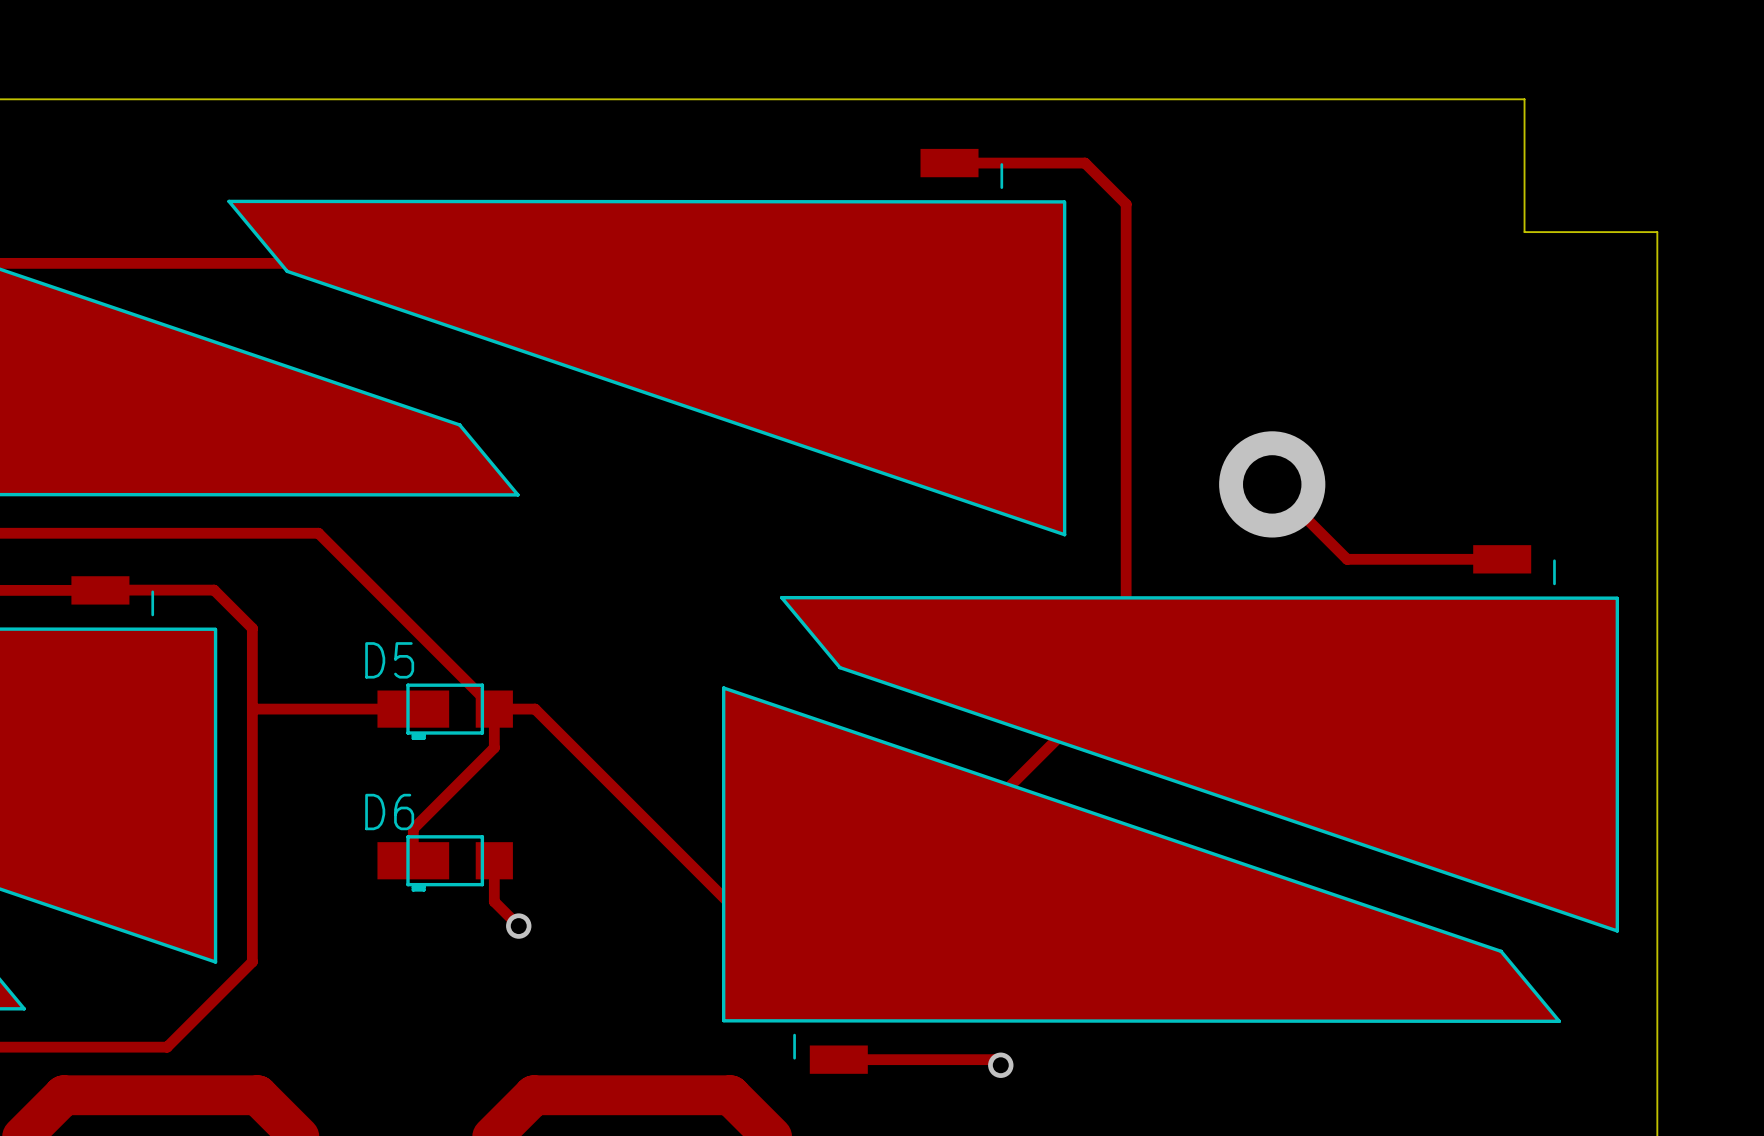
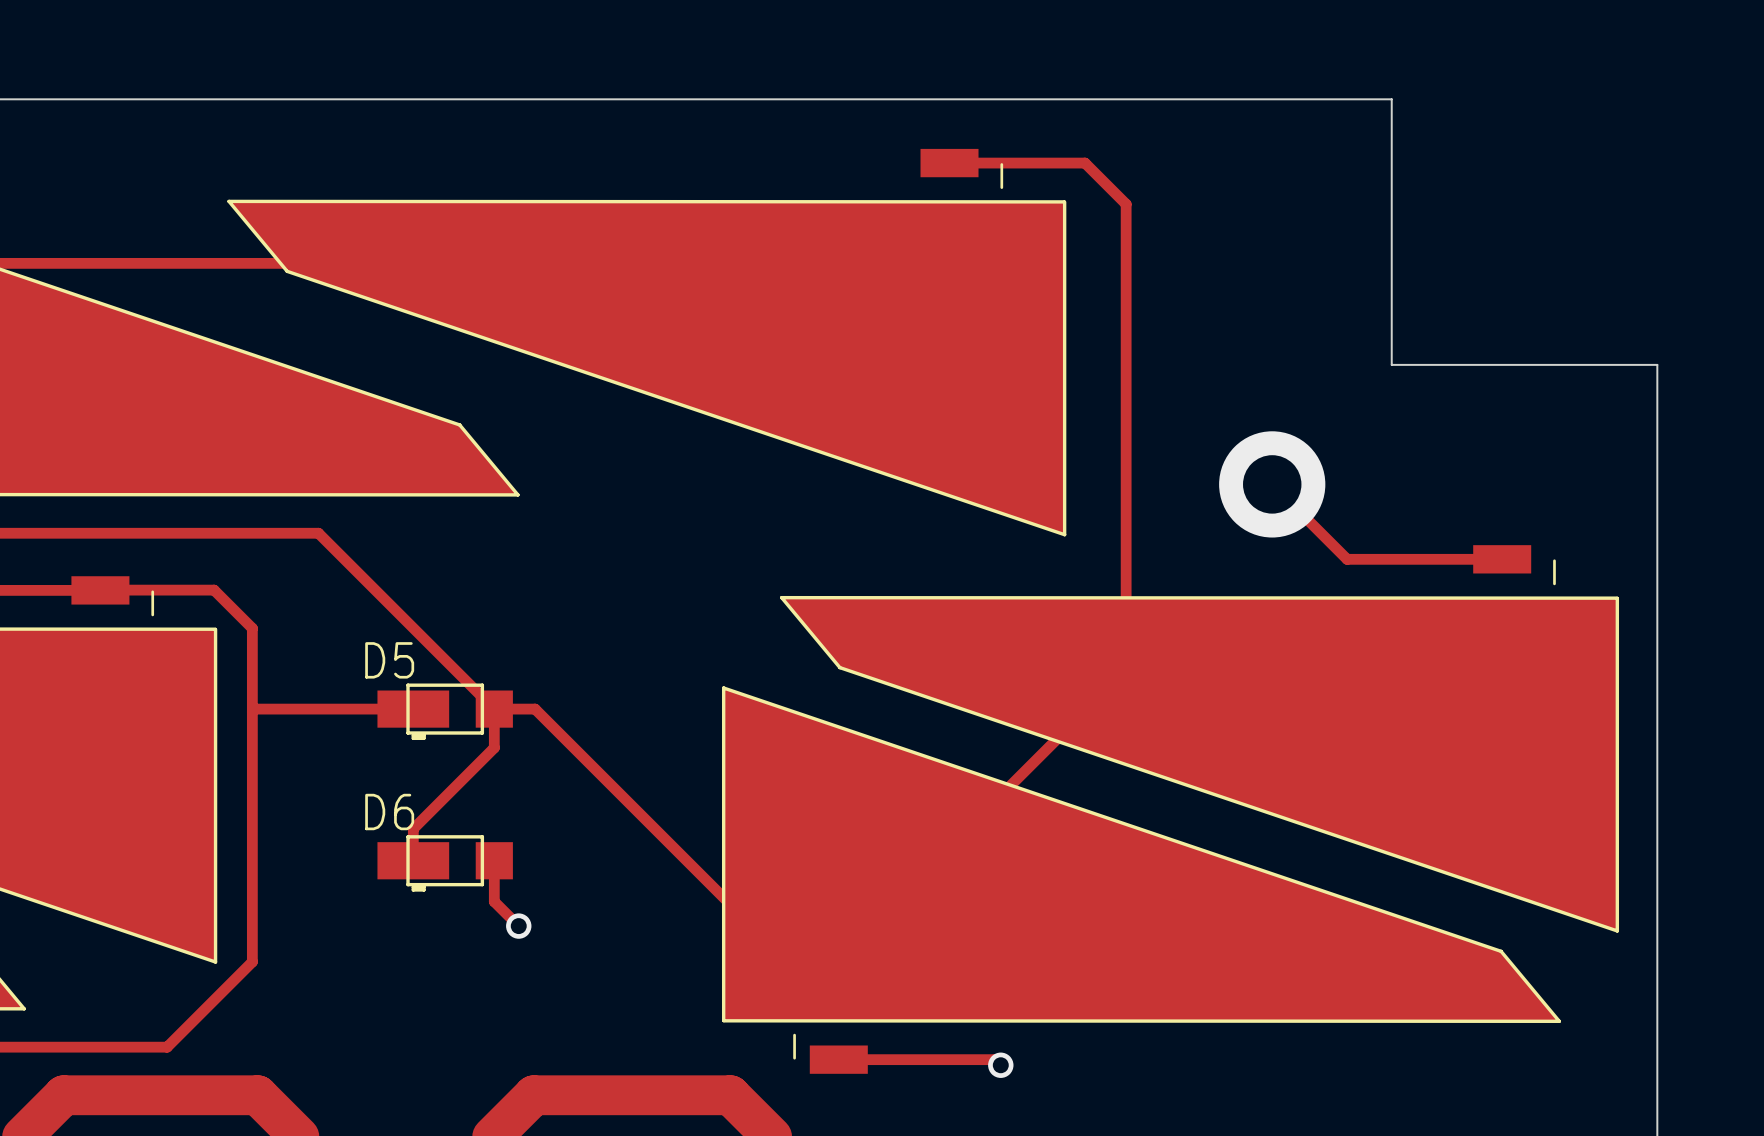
board edge: (1391, 99) (1524, 99) (1524, 232) (1657, 232) (1657, 364) -> (1391, 99) (1391, 364) (1657, 364)

